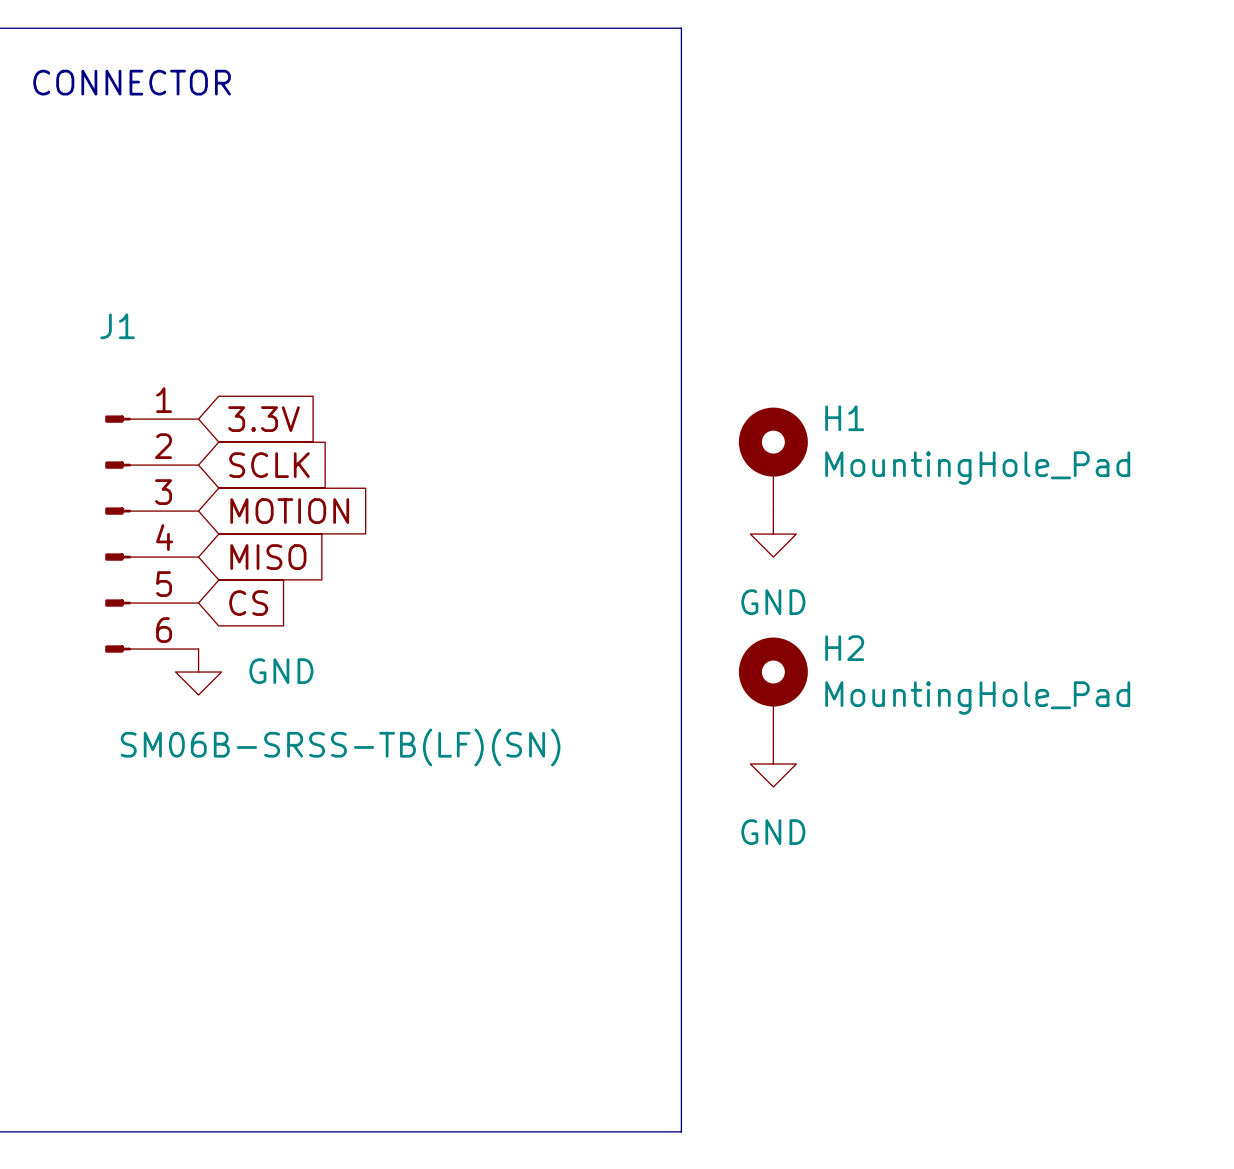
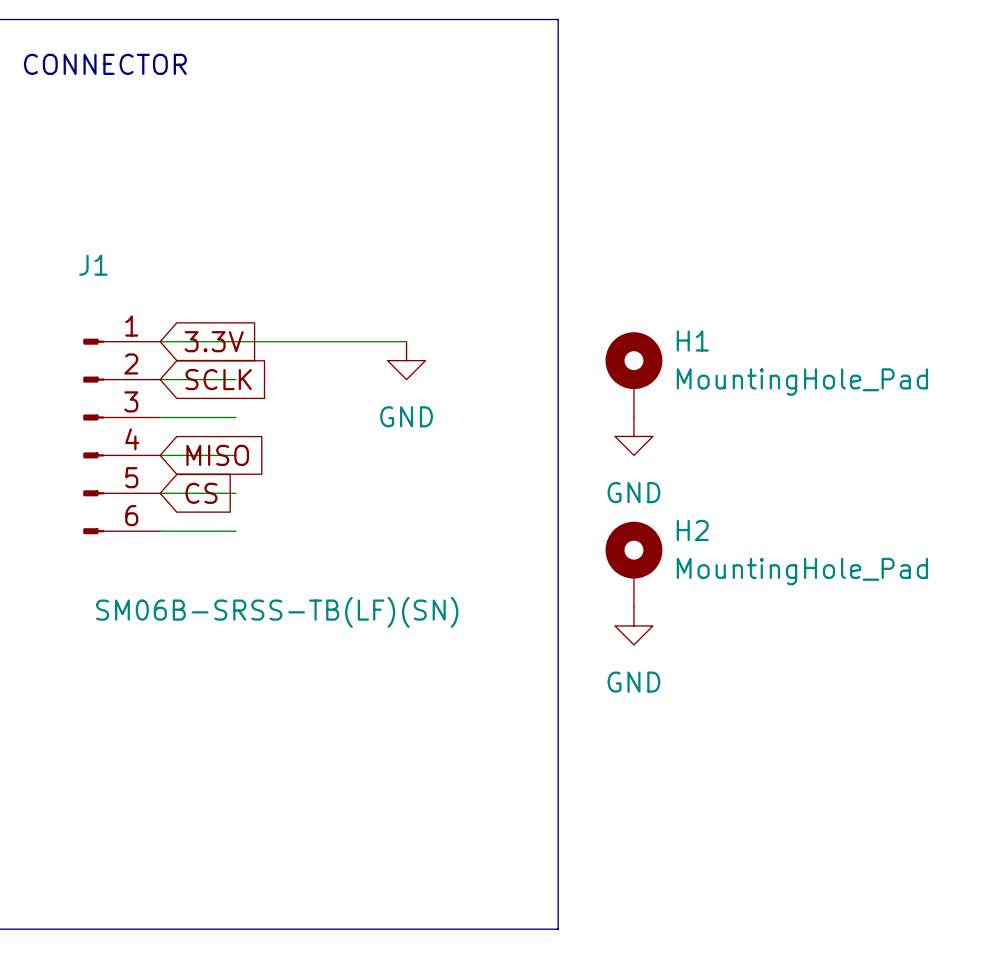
wire: none -> (160, 341) (406, 341)
wire: none -> (160, 379) (235, 379)
wire: none -> (160, 417) (235, 417)
global label: MOTION (289, 511) -> none
wire: none -> (160, 455) (235, 455)
wire: none -> (160, 493) (235, 493)
wire: none -> (160, 531) (235, 531)
power symbol text position: GND (281, 671) -> GND (406, 416)
power symbol position: GND (198, 672) -> GND (406, 360)

